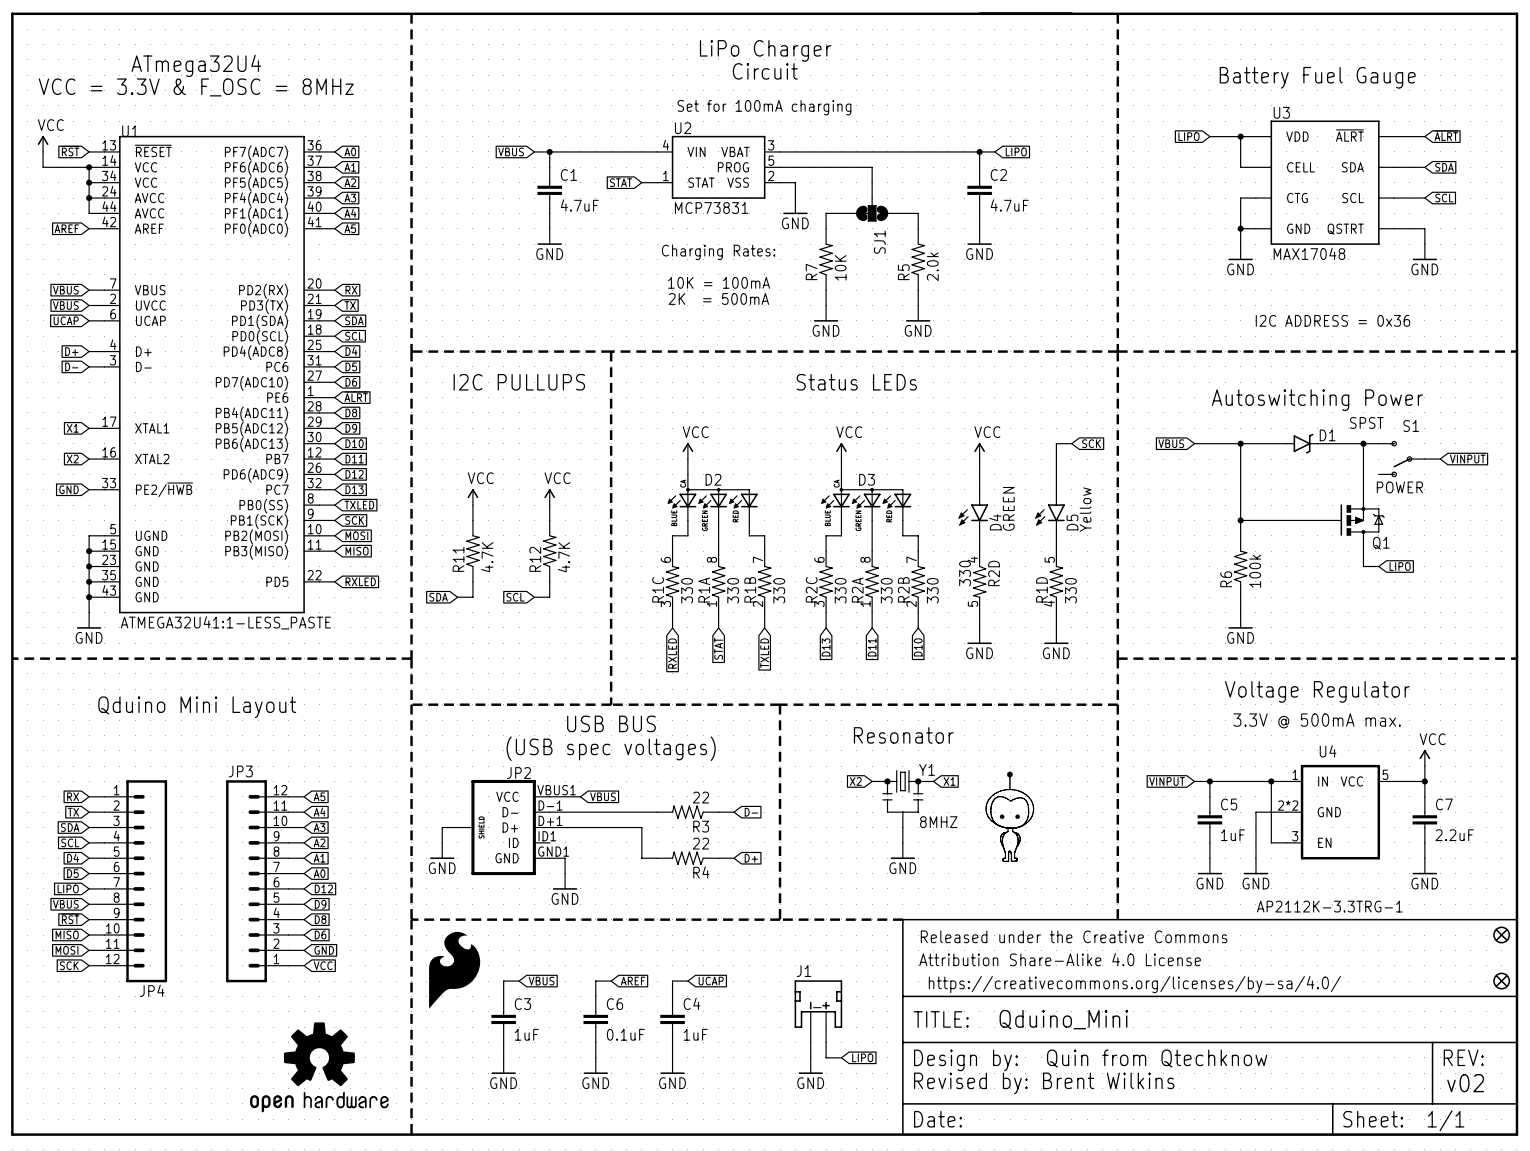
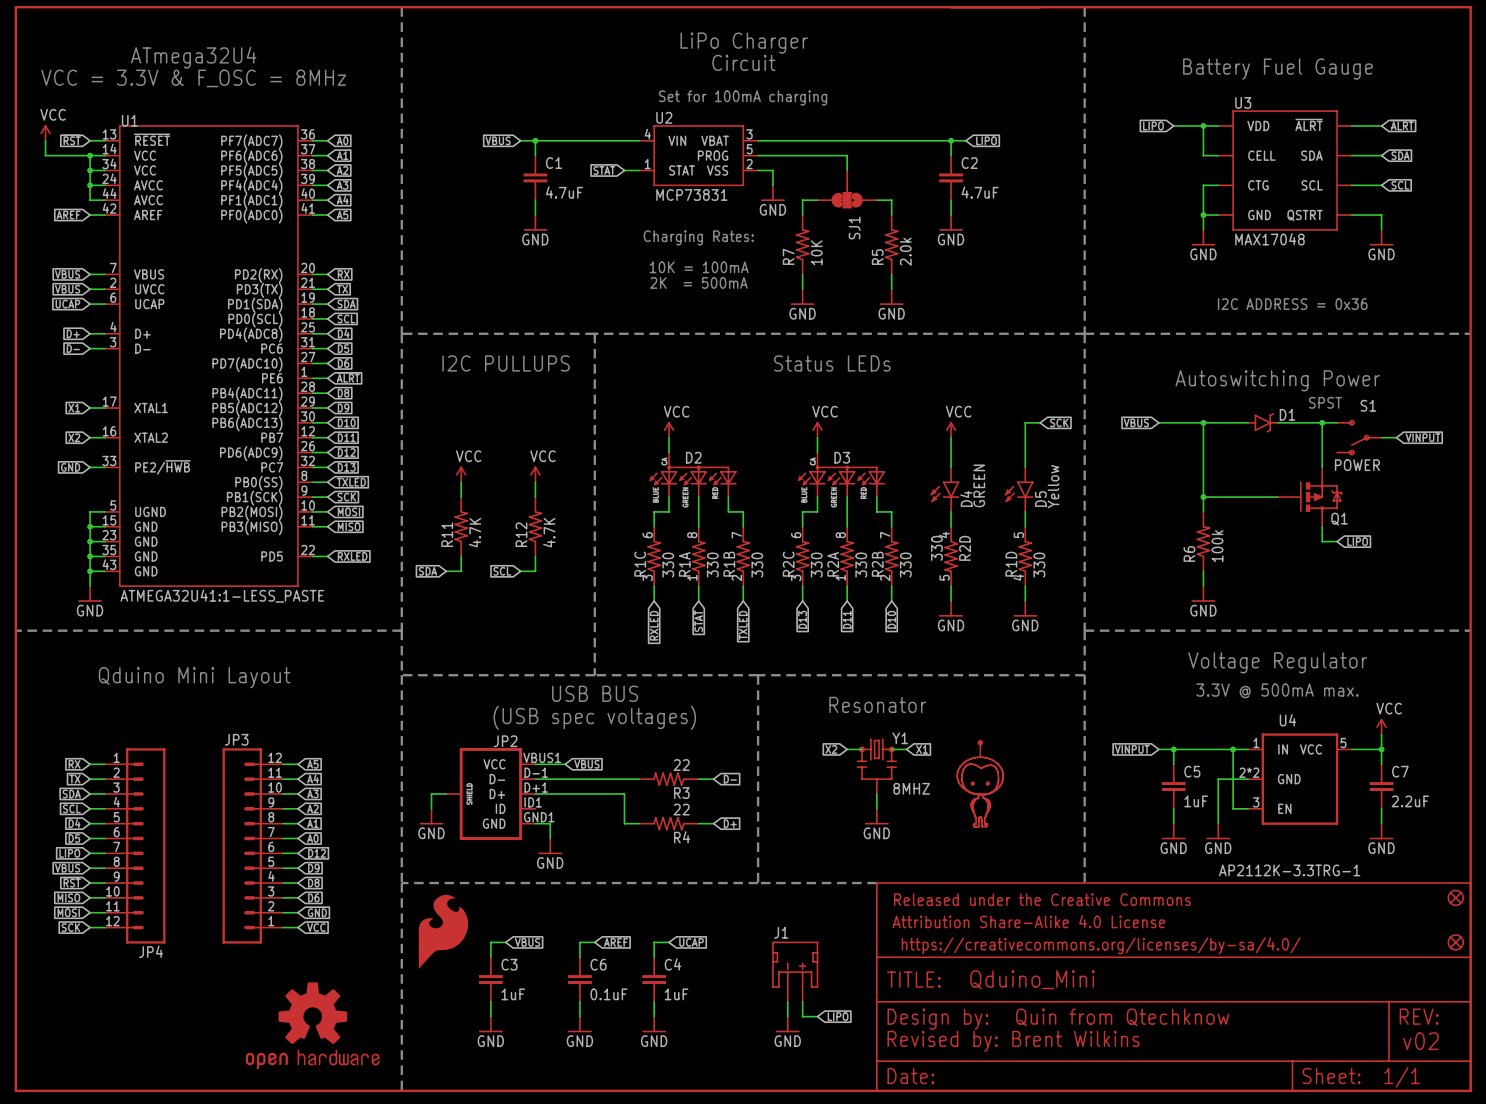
J1 text: - (817, 1007) -> none

